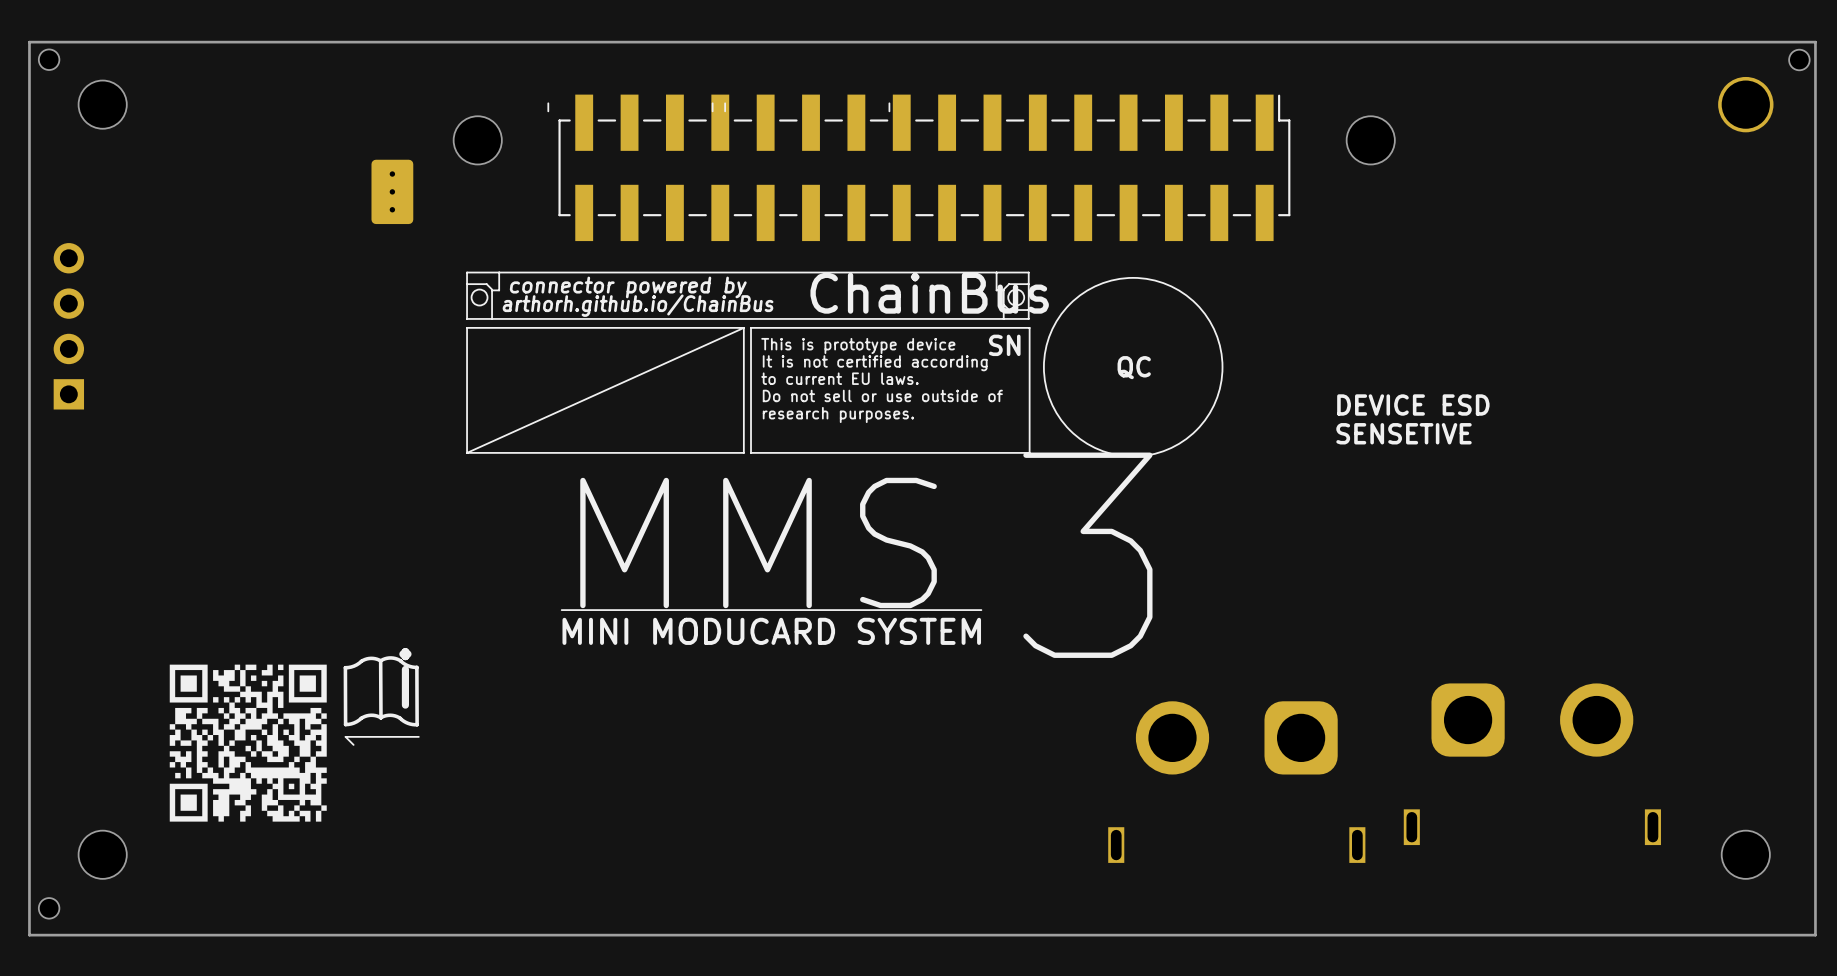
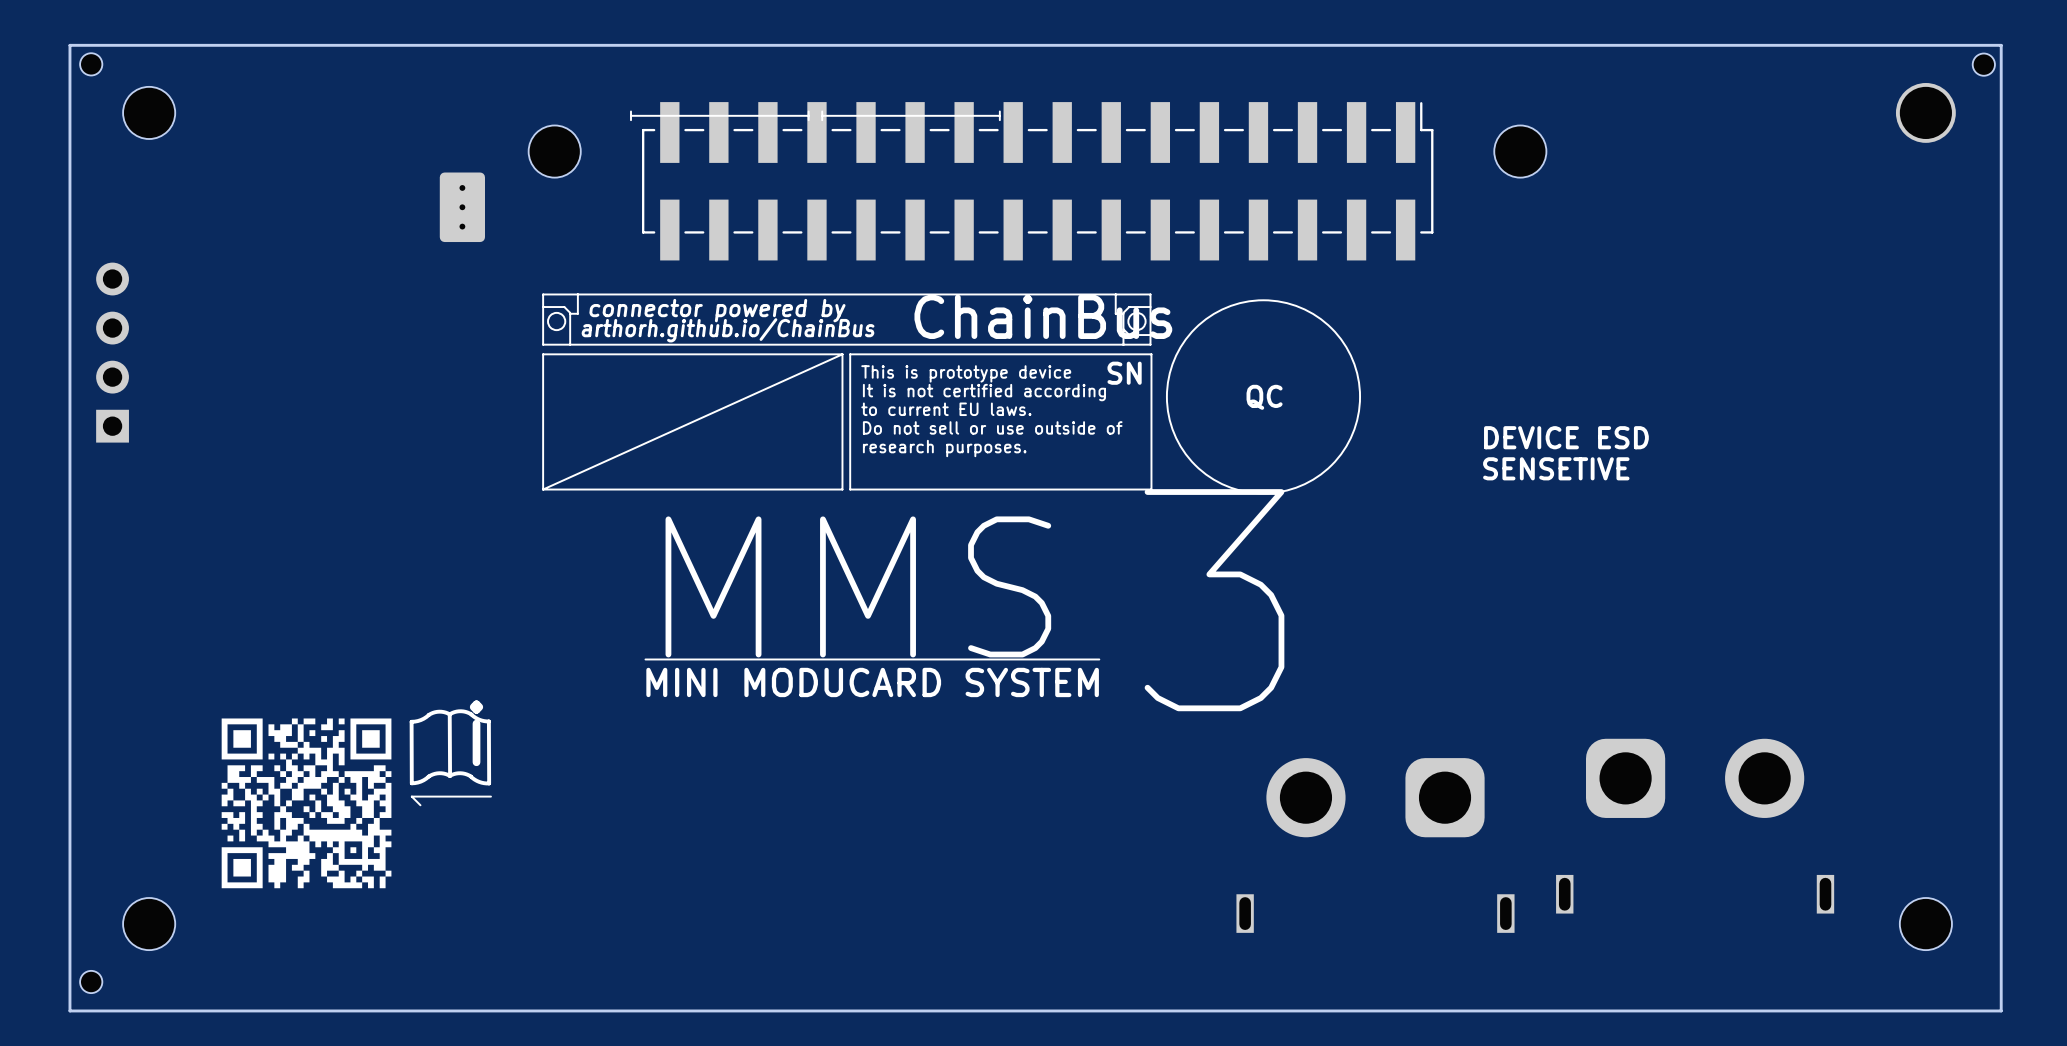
line: none -> (808, 115) (630, 115)
line: none -> (999, 115) (822, 115)

